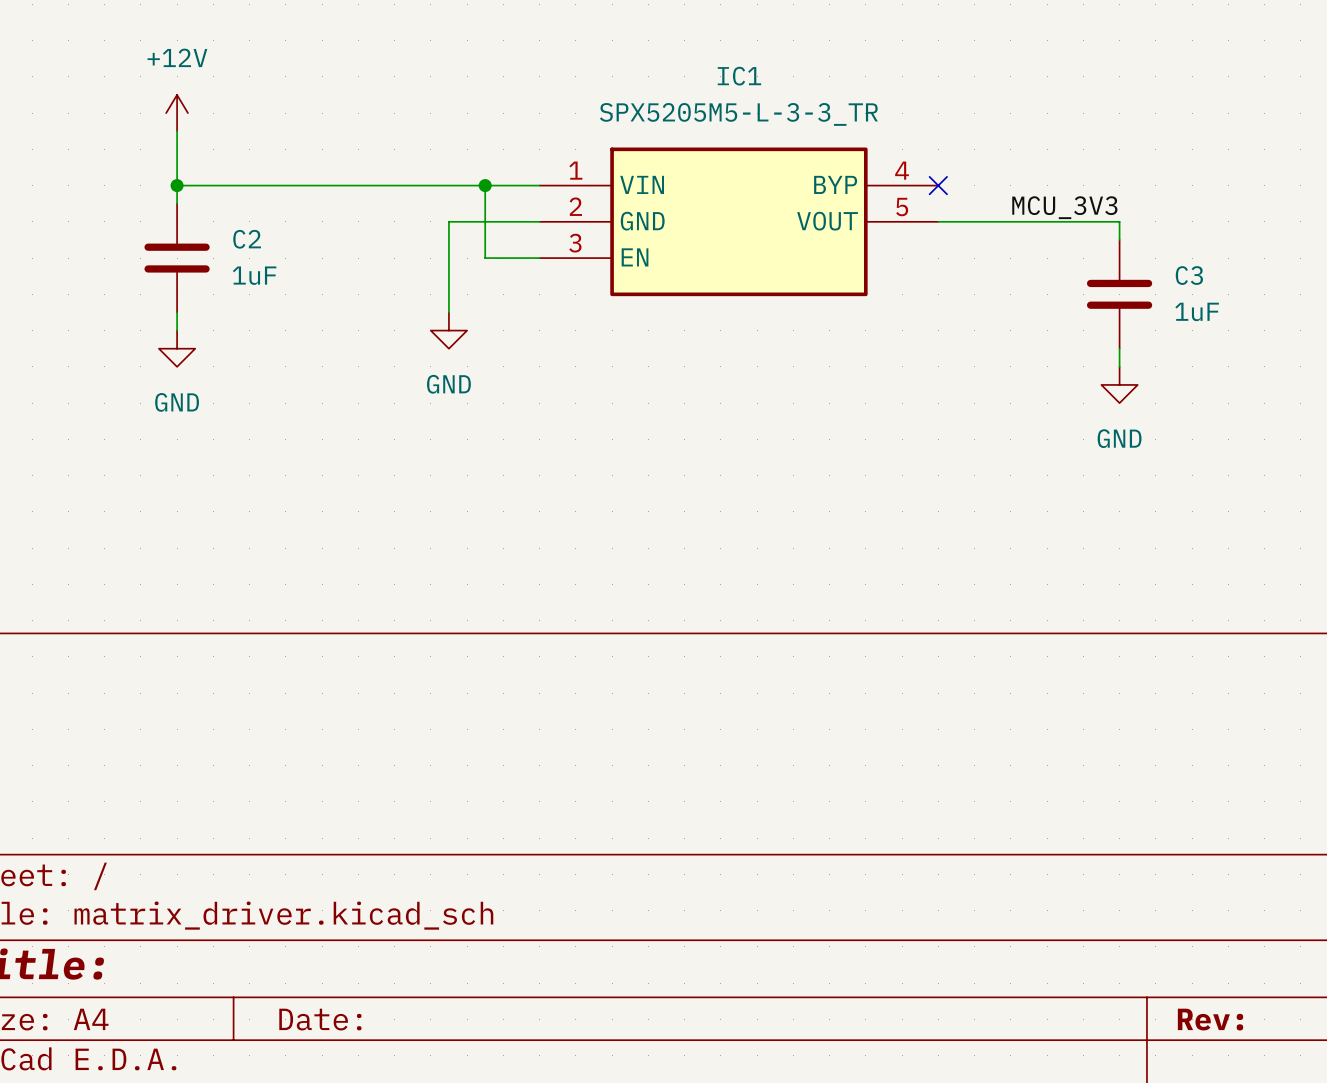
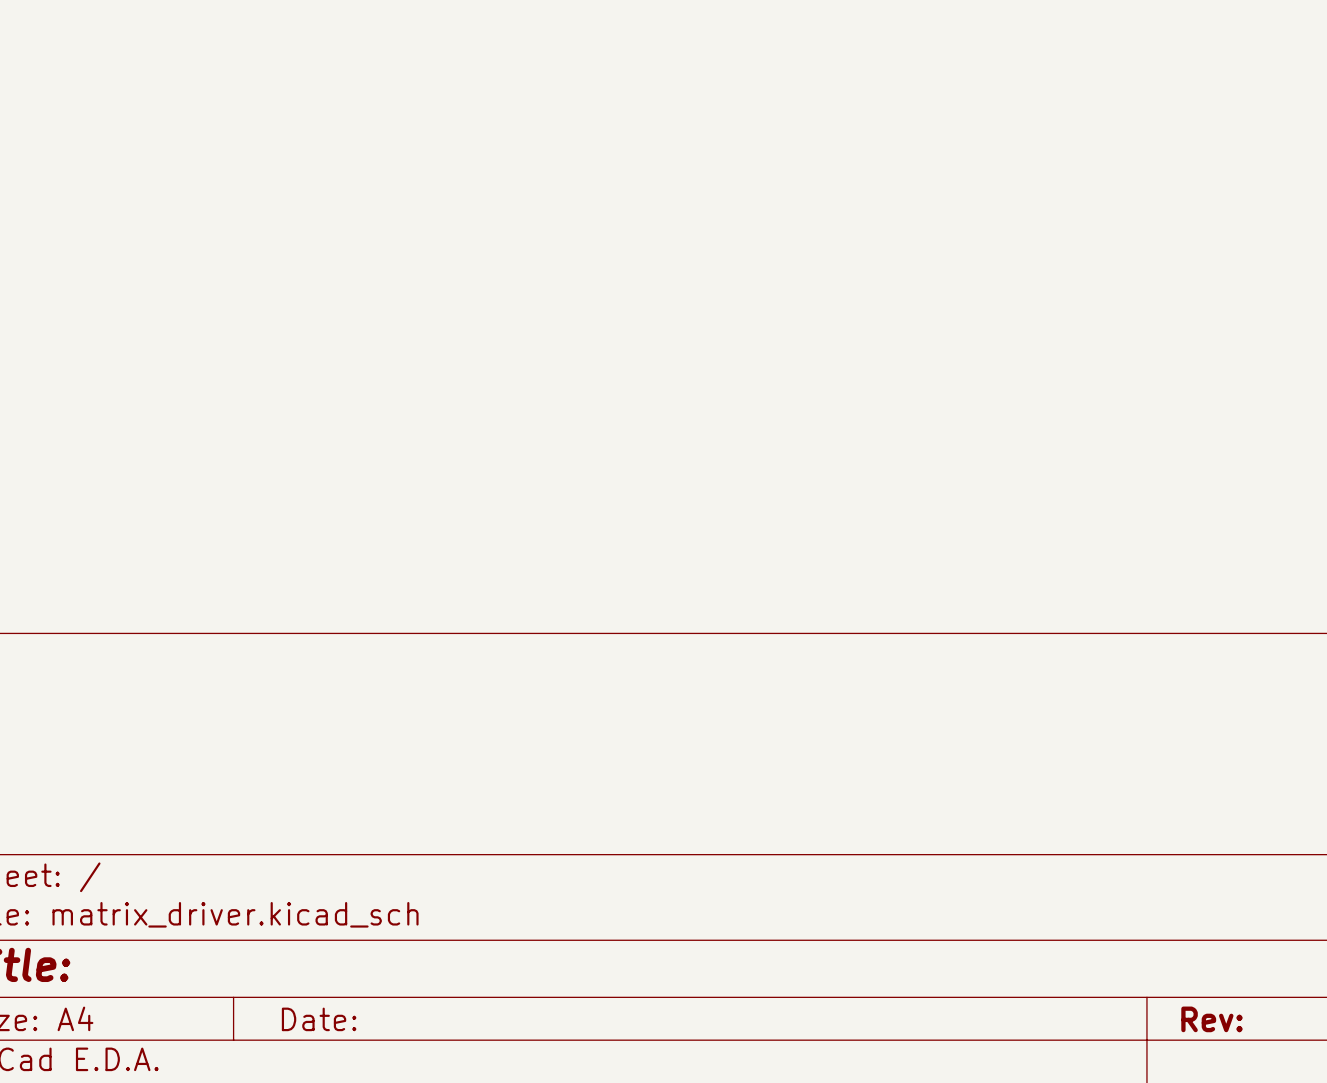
power symbol: +12V (177, 113) -> none
wire: (177, 131) (177, 203) -> none
wire: (177, 185) (539, 185) -> none
junction: (177, 185) -> none
wire: (485, 185) (485, 258) (539, 258) -> none
junction: (485, 185) -> none
no-connect mark: (938, 185) -> none
label: MCU_3V3 (1064, 207) -> none
wire: (539, 221) (448, 221) (448, 312) -> none
IC1: SPX5205M5-L-3-3_TR (738, 221) -> none
wire: (938, 221) (1119, 221) (1119, 239) -> none
C2: 1uF (177, 258) -> none
C3: 1uF (1119, 294) -> none
wire: (177, 312) (177, 330) -> none
power symbol: GND (448, 330) -> none
power symbol: GND (177, 348) -> none
wire: (1119, 348) (1119, 366) -> none
power symbol: GND (1119, 384) -> none

